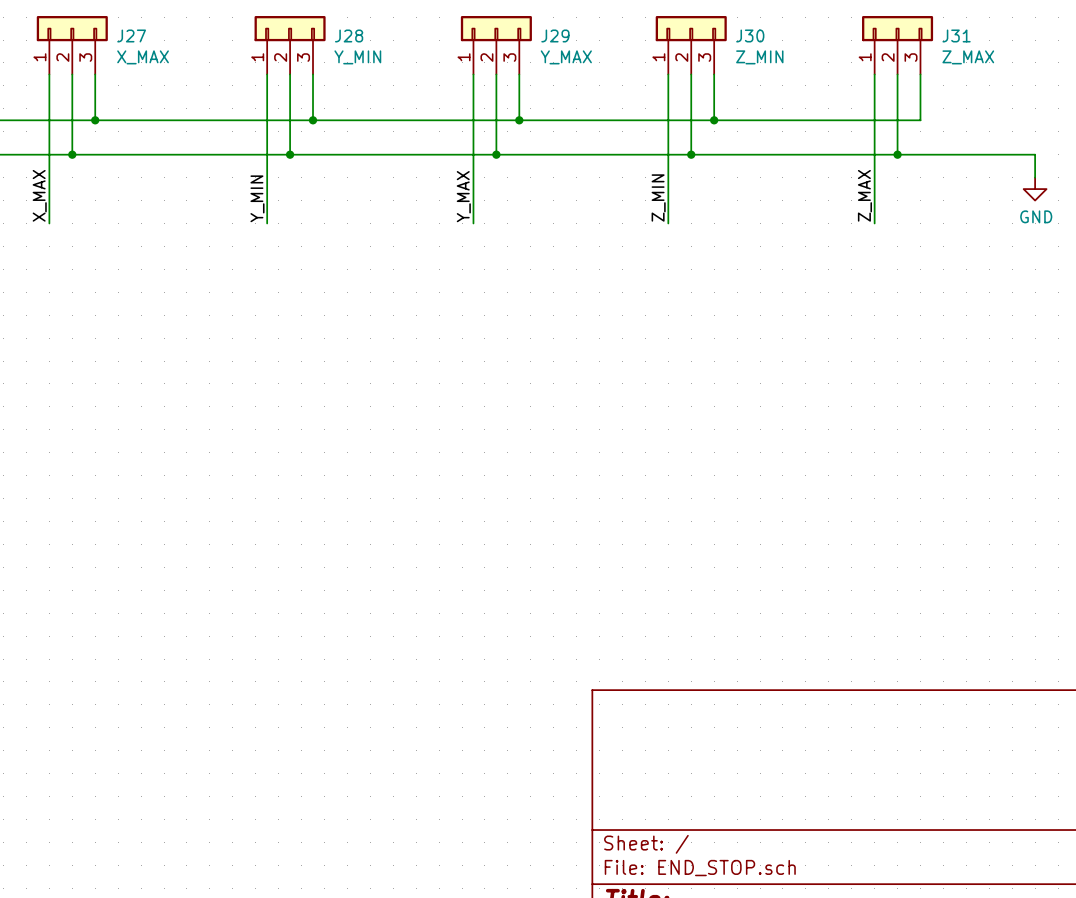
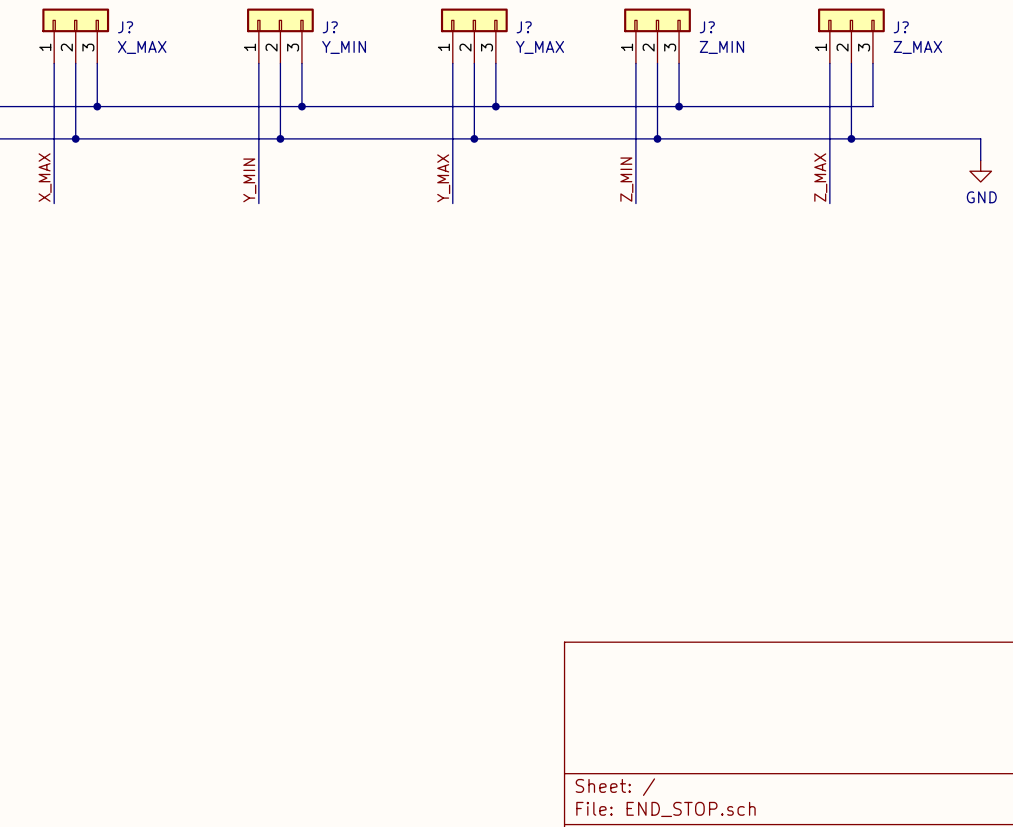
J27 name: J27 (131, 35) -> J? (125, 27)
J28 name: J28 (349, 35) -> J? (330, 27)
J29 name: J29 (555, 35) -> J? (524, 27)
J30 name: J30 (750, 35) -> J? (707, 27)
J31 name: J31 (956, 35) -> J? (901, 27)

